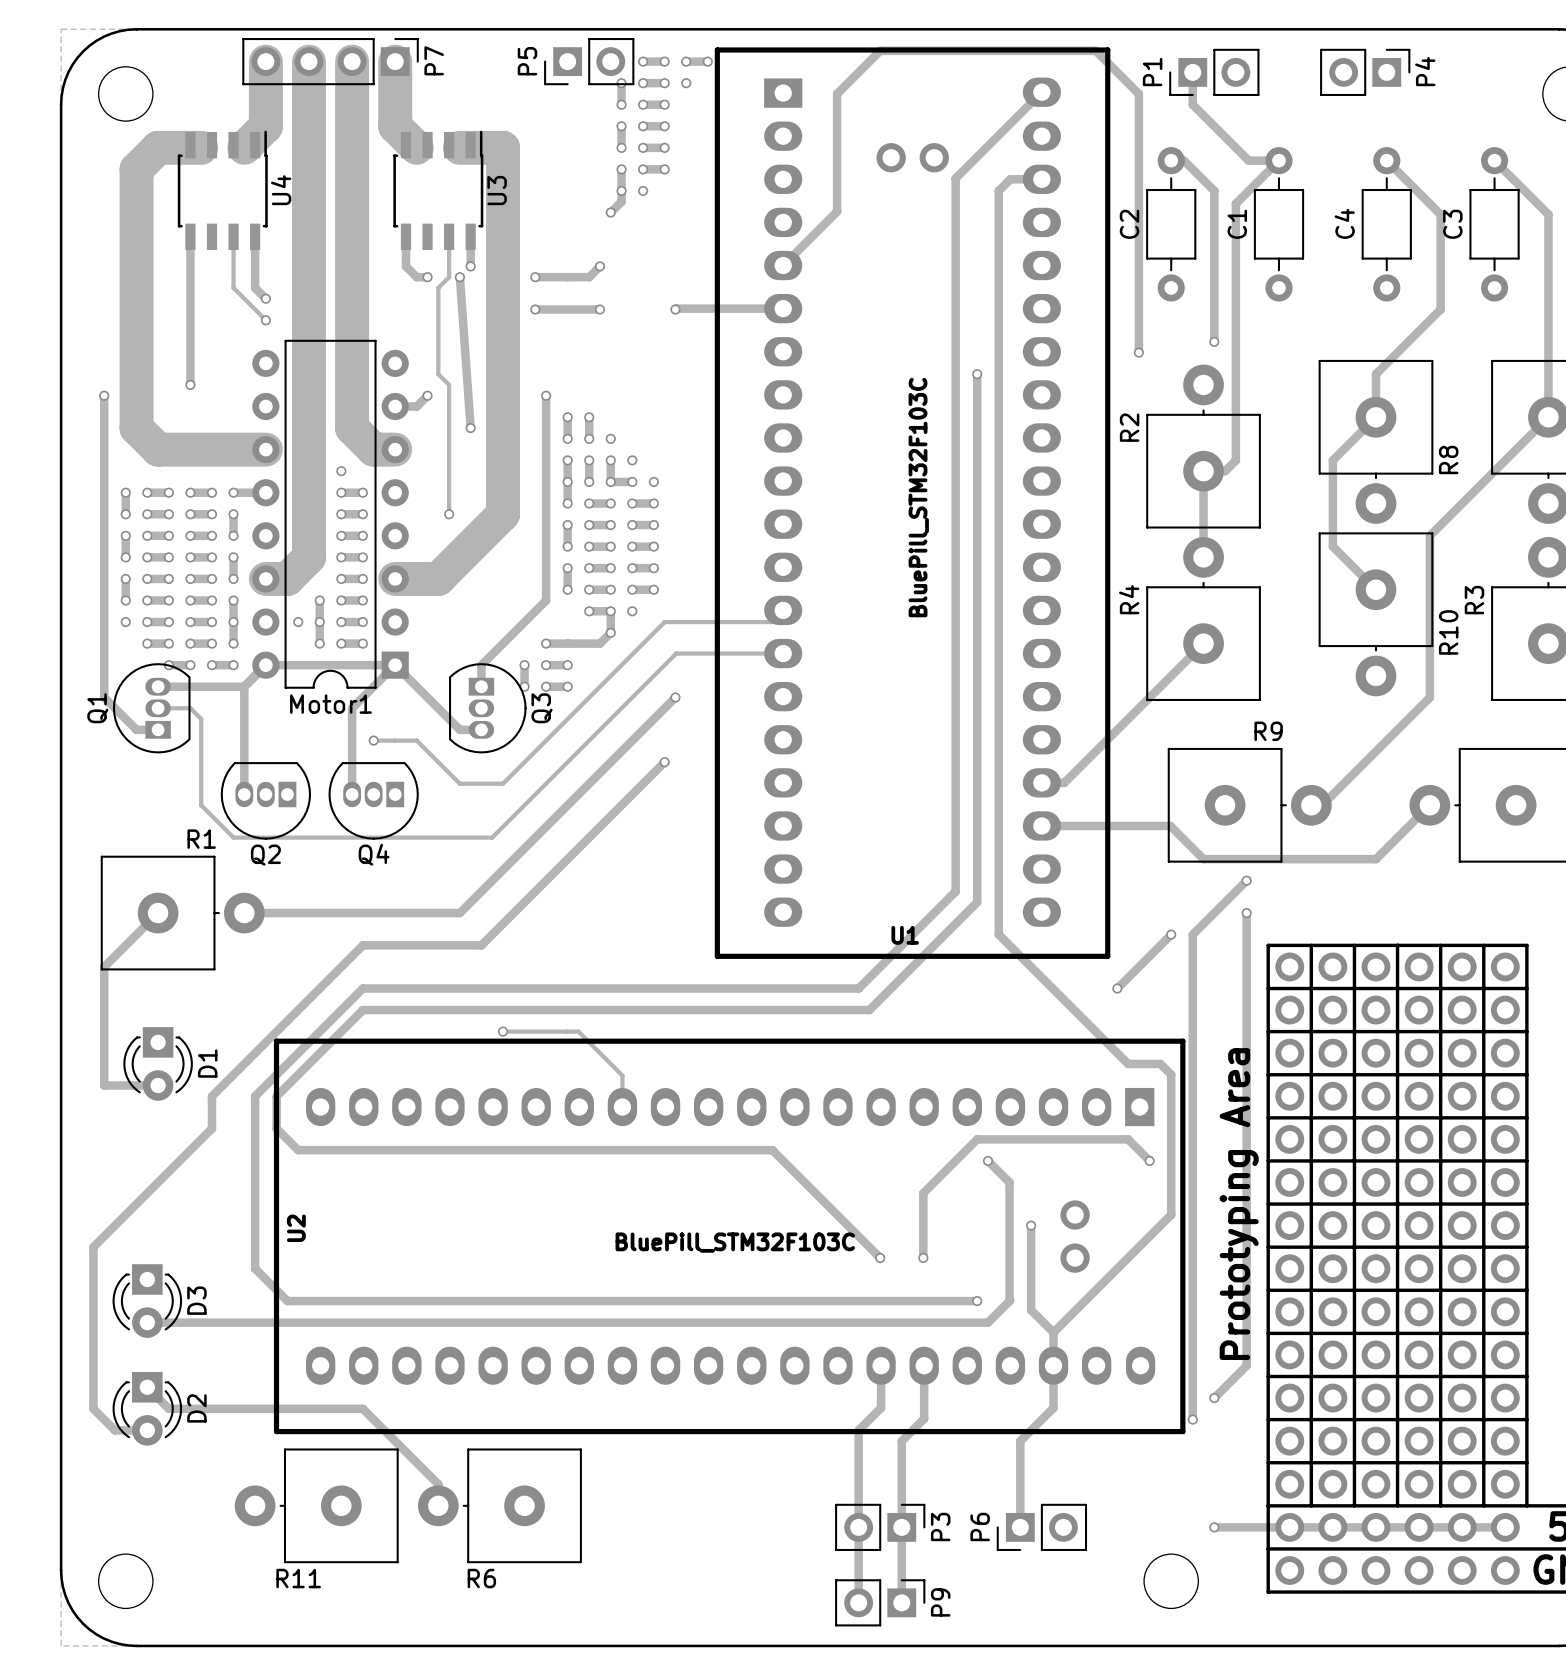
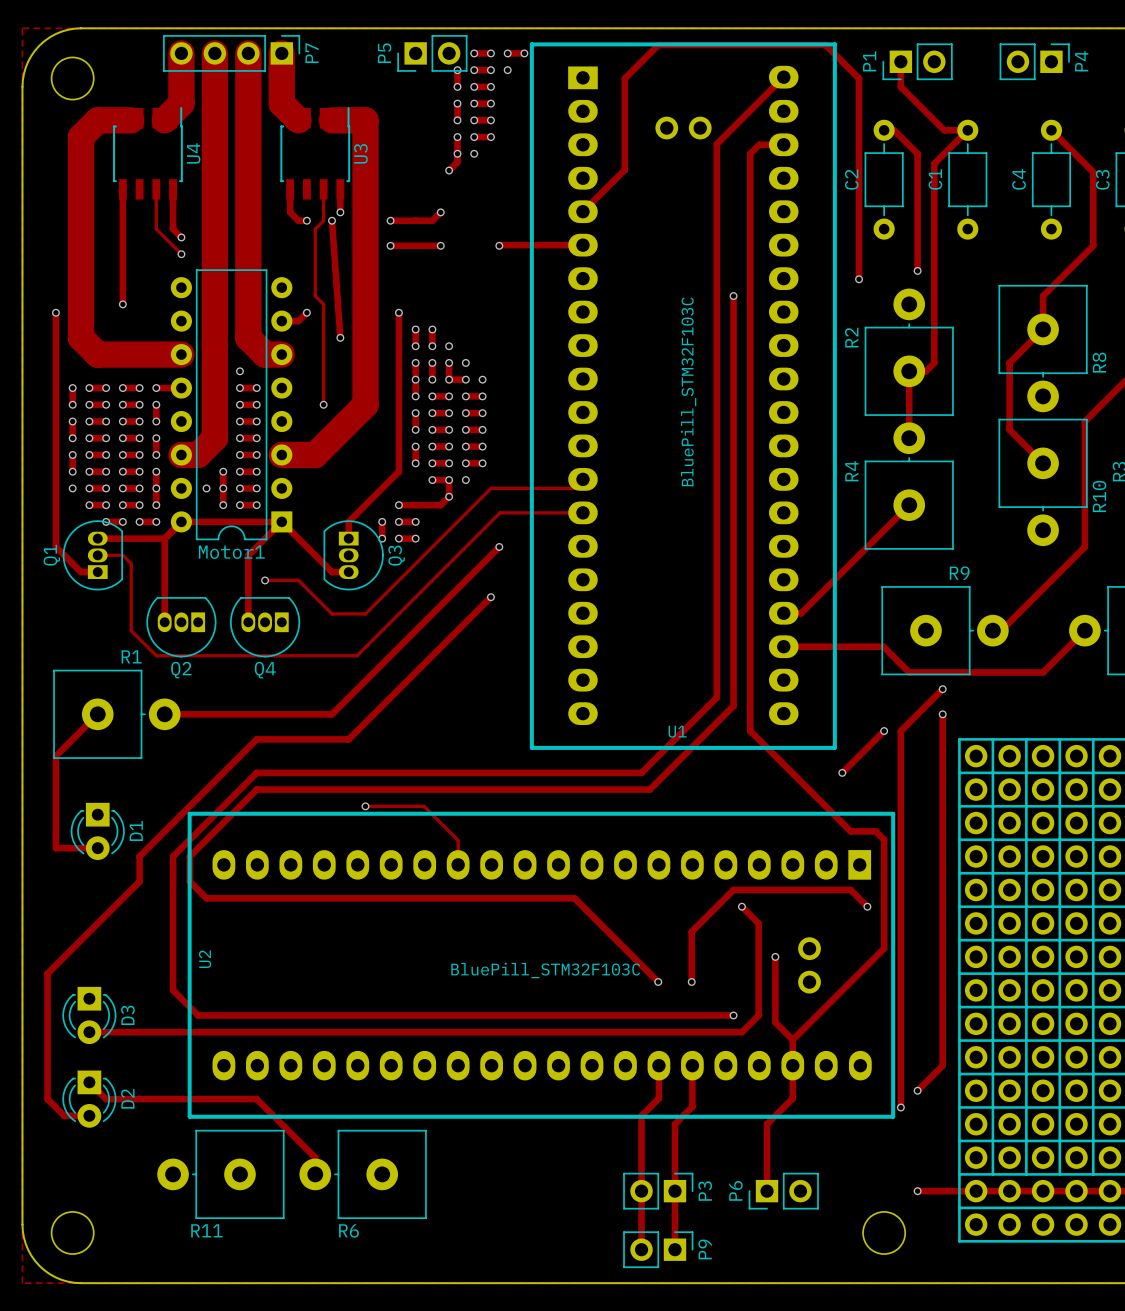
text: Prototyping Area (1239, 1204) -> none

